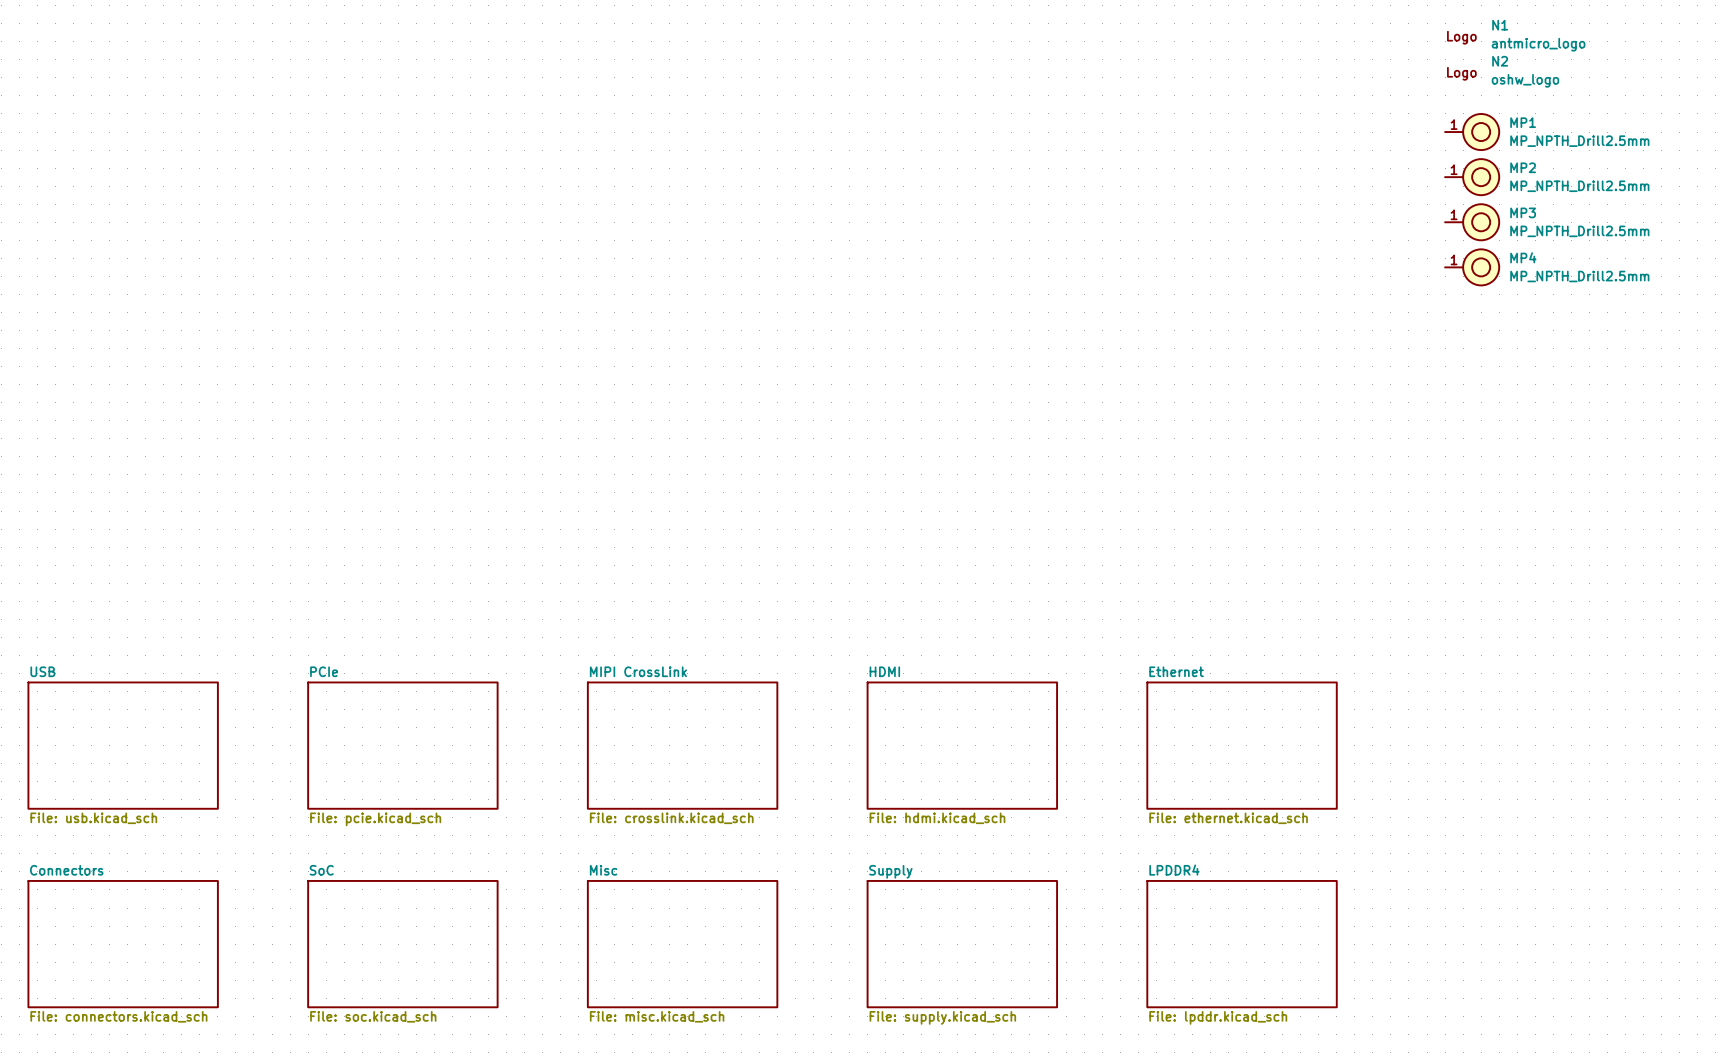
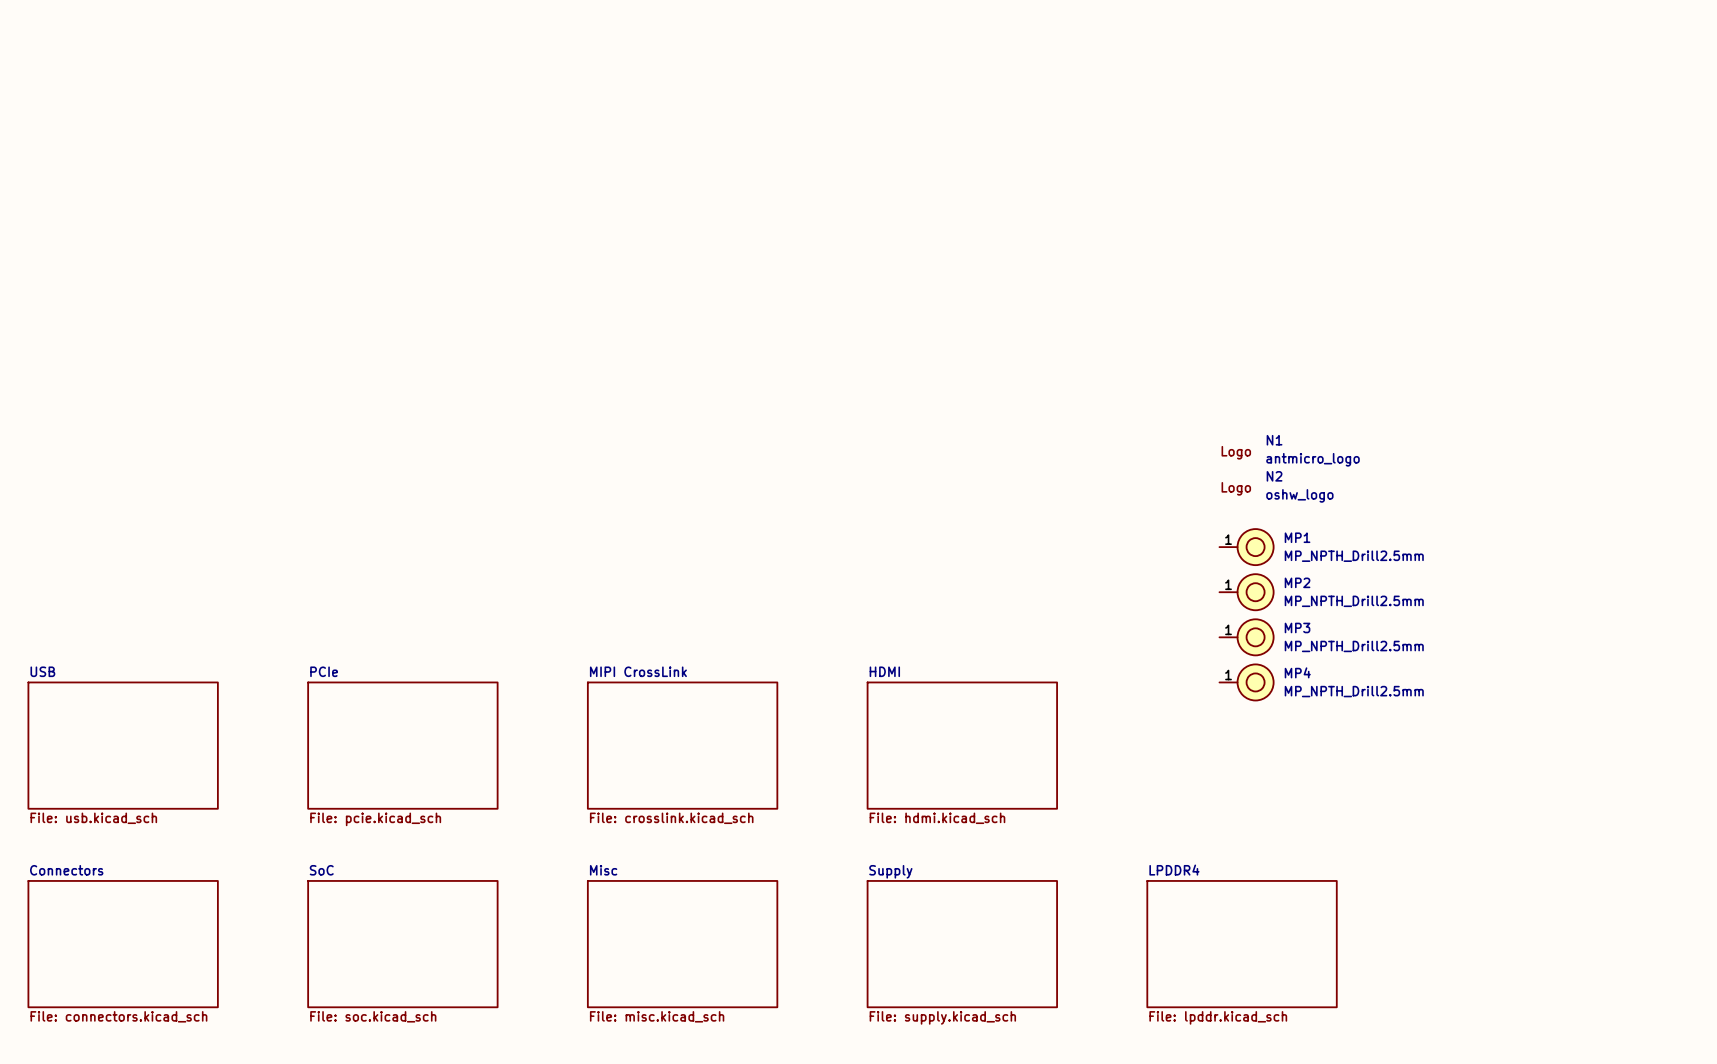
N1 position: (1516, 35) -> (1290, 450)
N2 position: (1503, 71) -> (1277, 486)
MP1 position: (1472, 132) -> (1247, 547)
MP2 position: (1472, 177) -> (1247, 592)
MP3 position: (1472, 222) -> (1247, 637)
MP4 position: (1472, 267) -> (1247, 682)
sheet Ethernet: File: ethernet.kicad_sch (1242, 745) -> none

